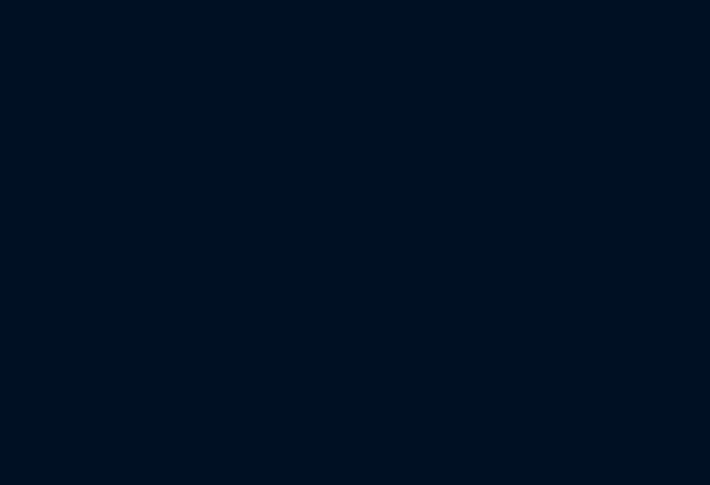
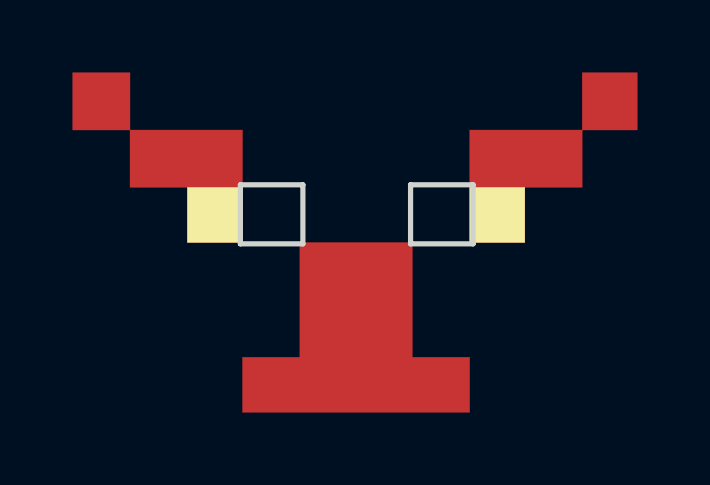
drawing: none -> [72, 72, 638, 413]

